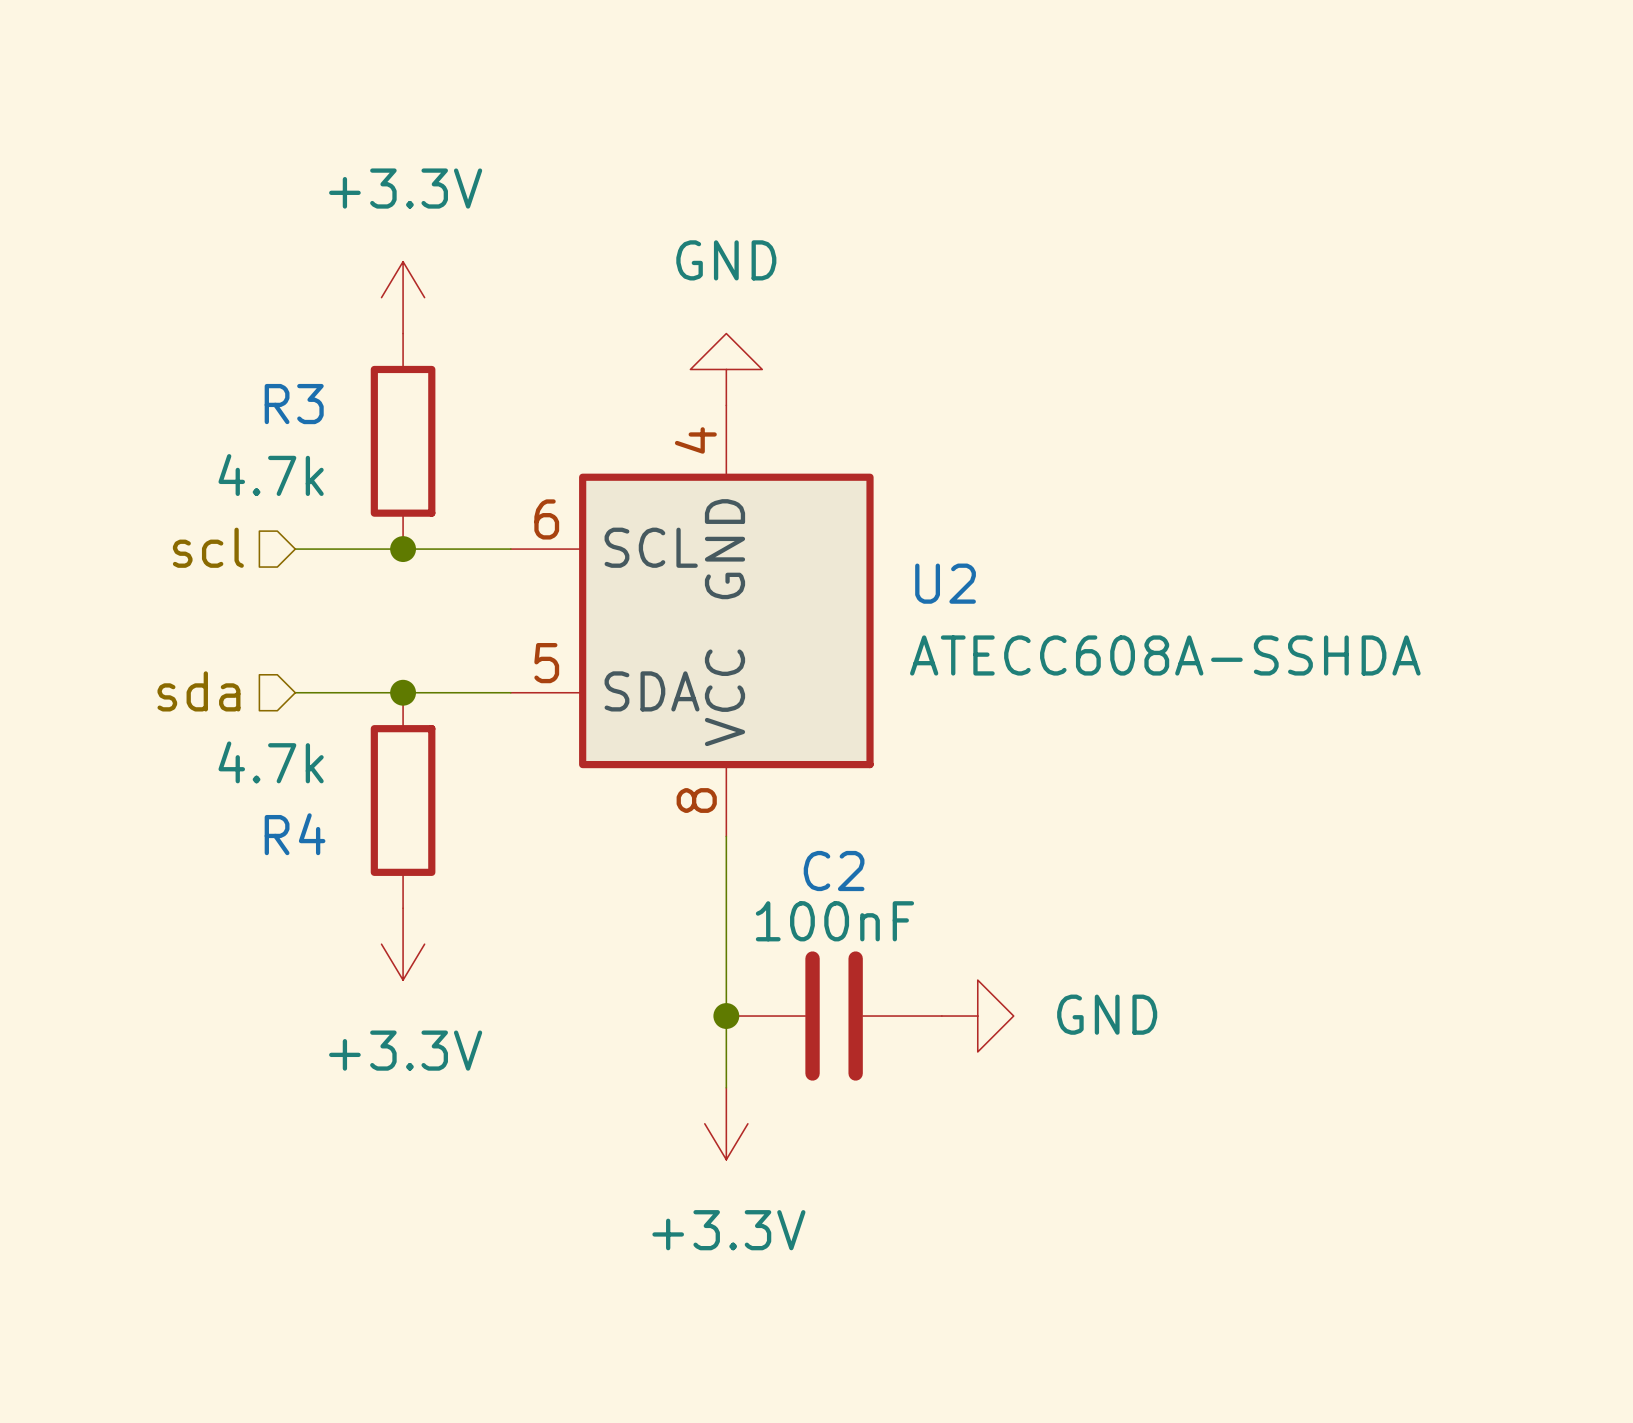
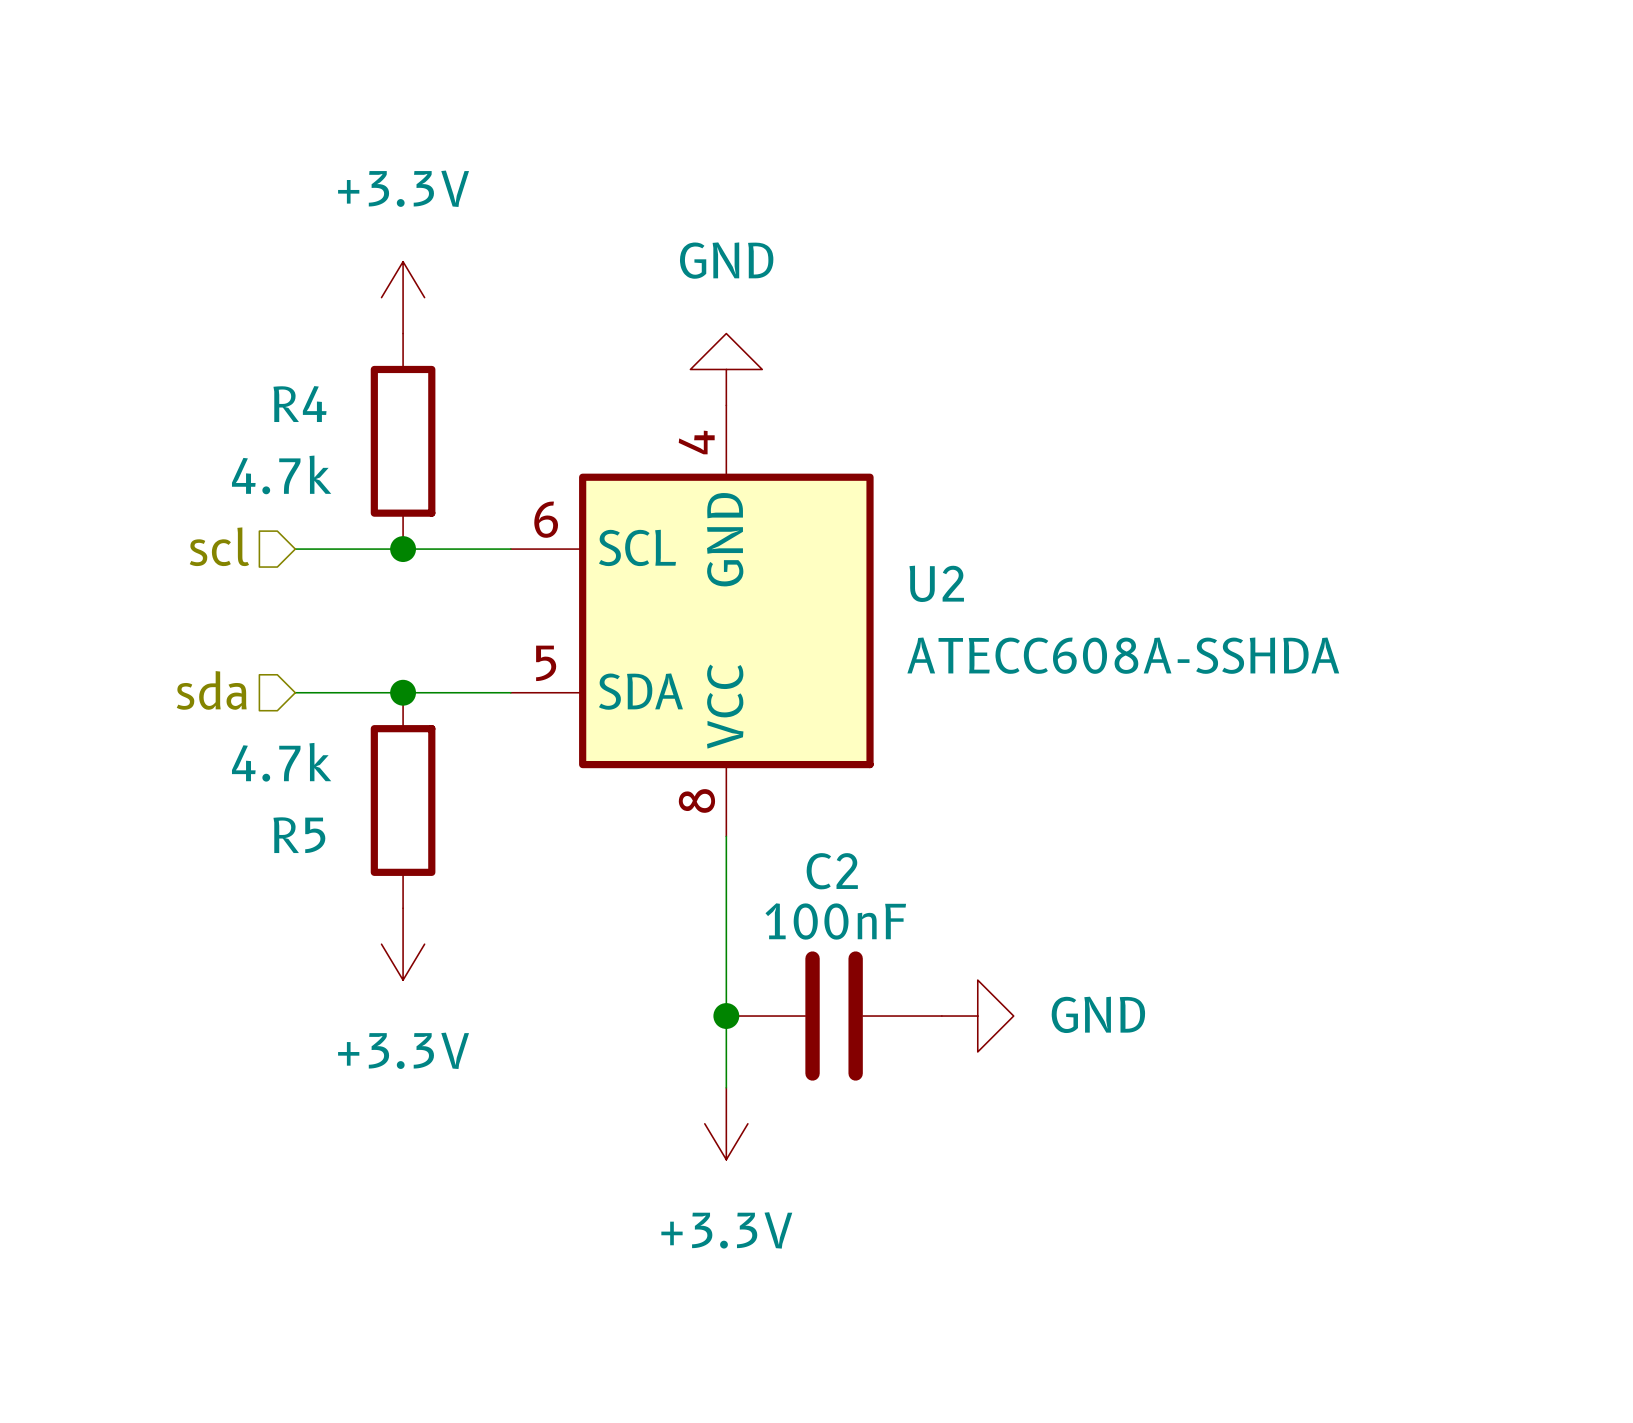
R3 name: R3 (294, 404) -> R4 (299, 404)
R4 name: R4 (295, 834) -> R5 (299, 835)

